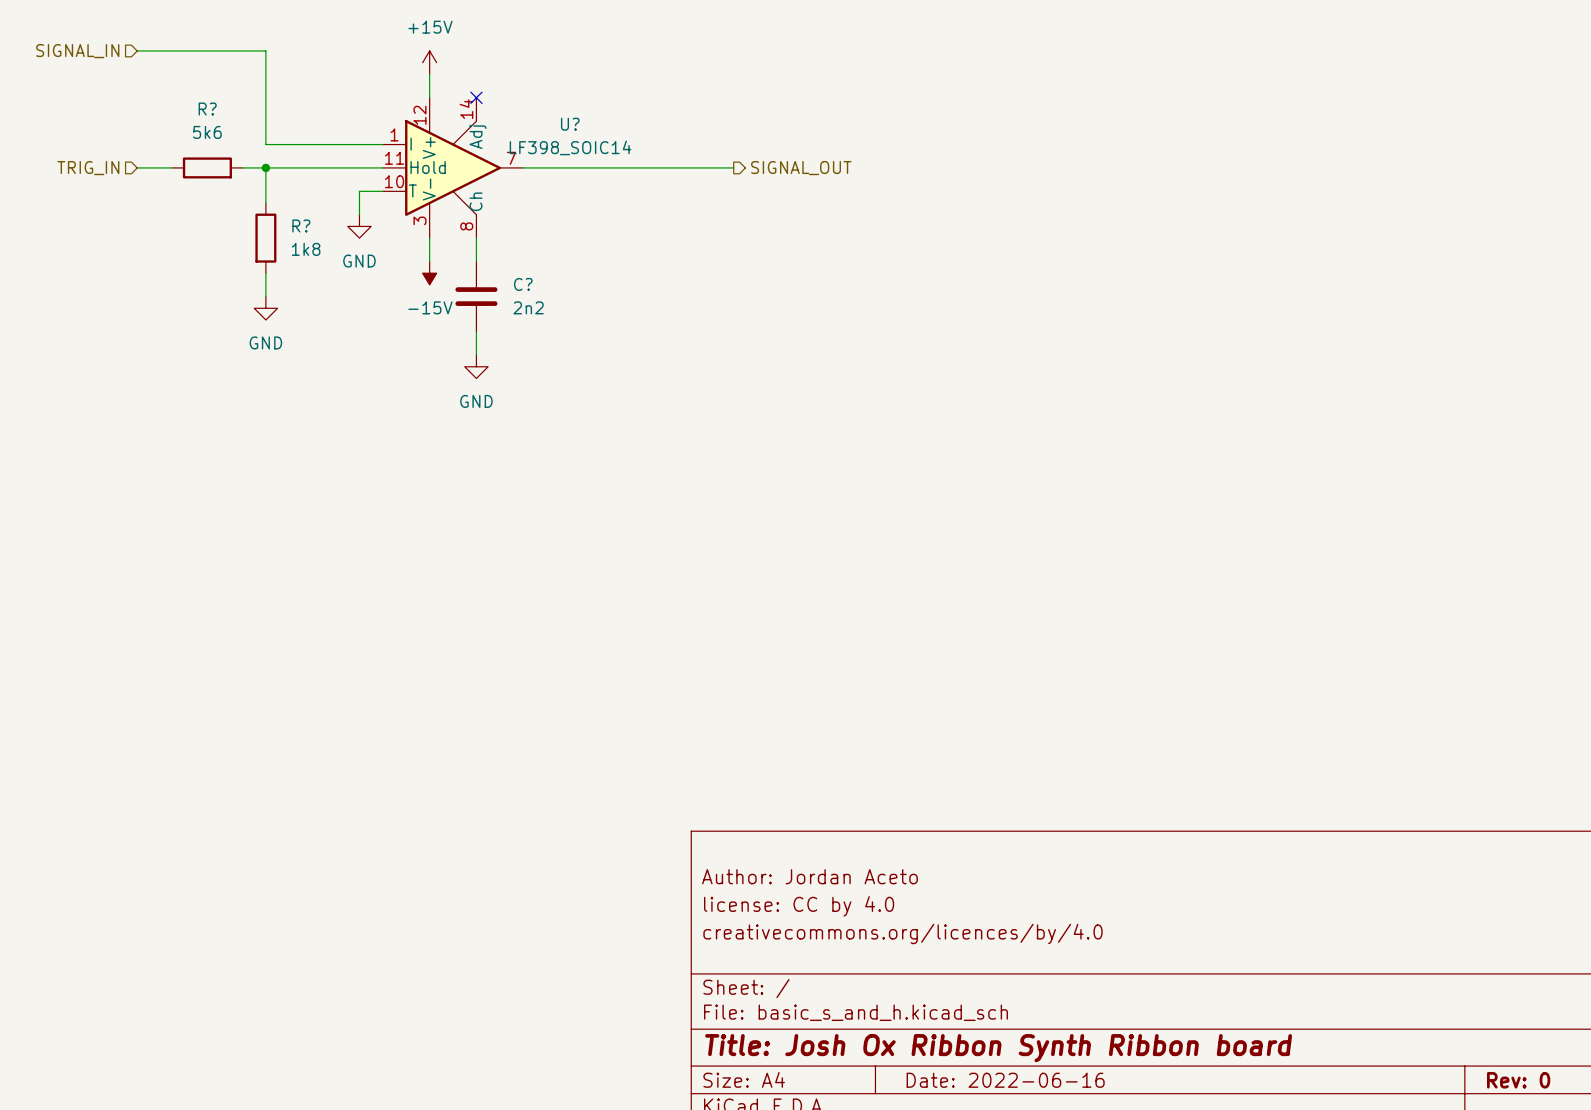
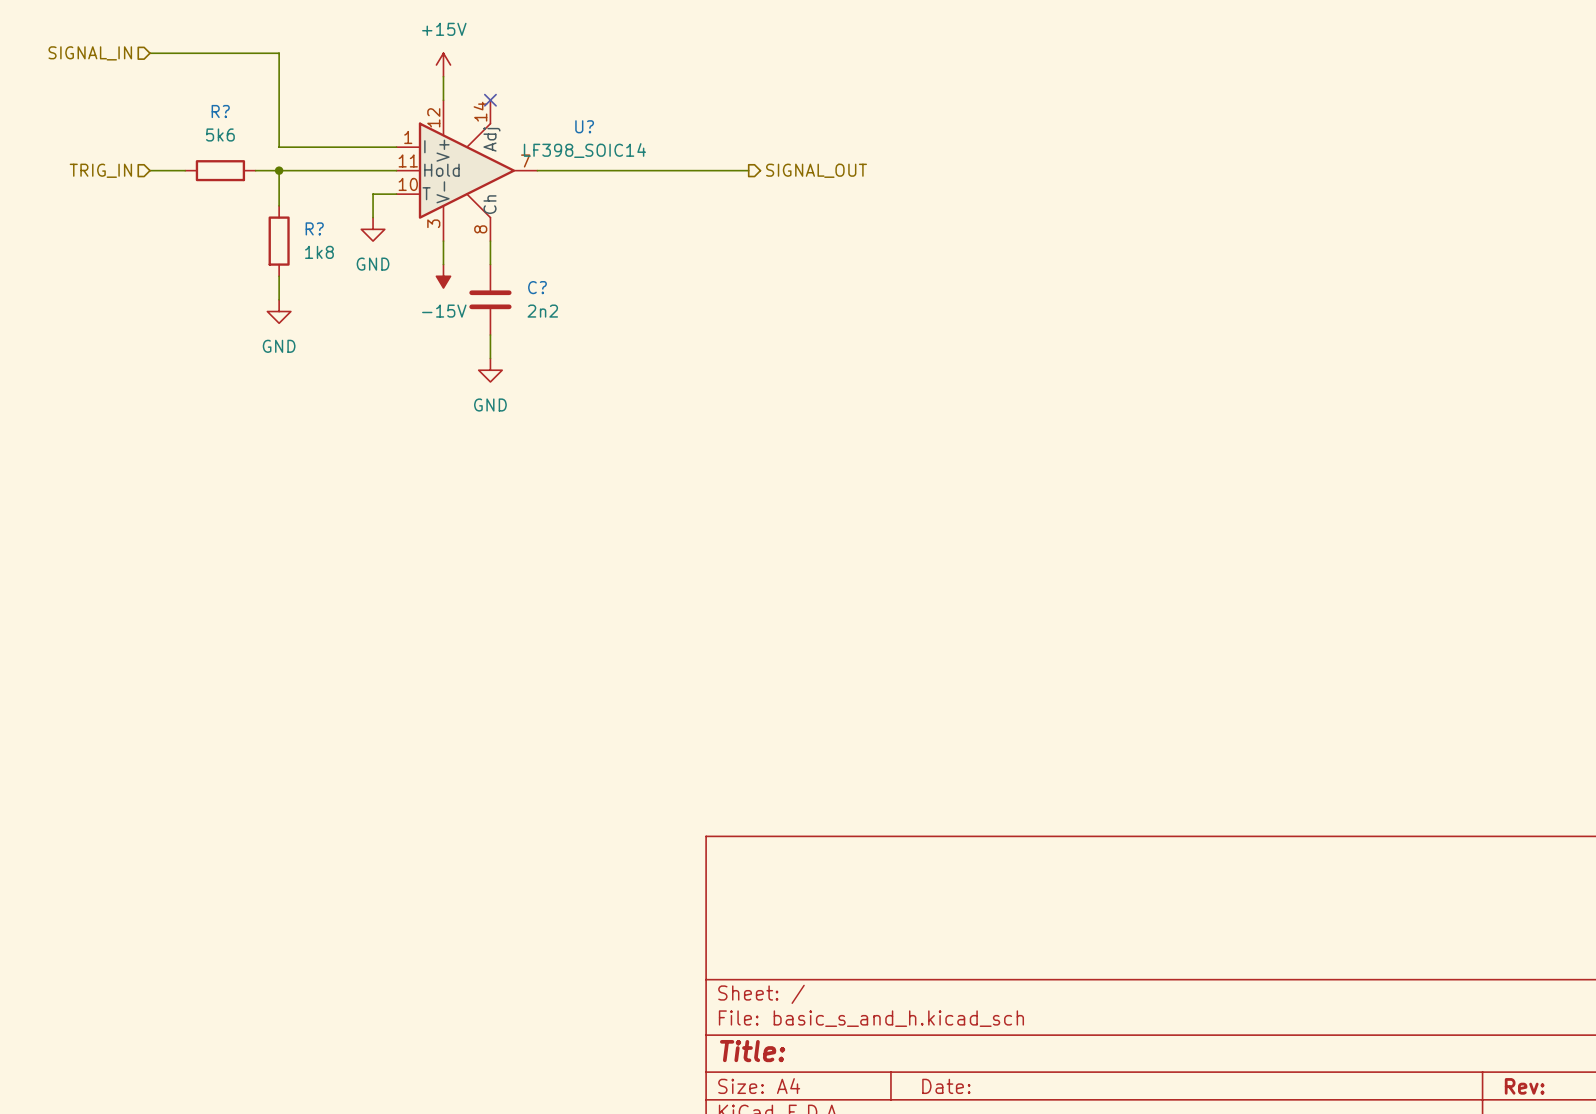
title block: Author: Jordan Aceto (809, 876) -> none
title block: license: CC by 4.0 (799, 906) -> none
title block: creativecommons.org/licences/by/4.0 (903, 933) -> none
title block: Title: Josh Ox Ribbon Synth Ribbon board (998, 1048) -> Title: (752, 1051)
title block: Date: 2022-06-16 (1005, 1080) -> Date: (946, 1086)
title block: Rev: 0 (1518, 1080) -> Rev: (1524, 1086)

